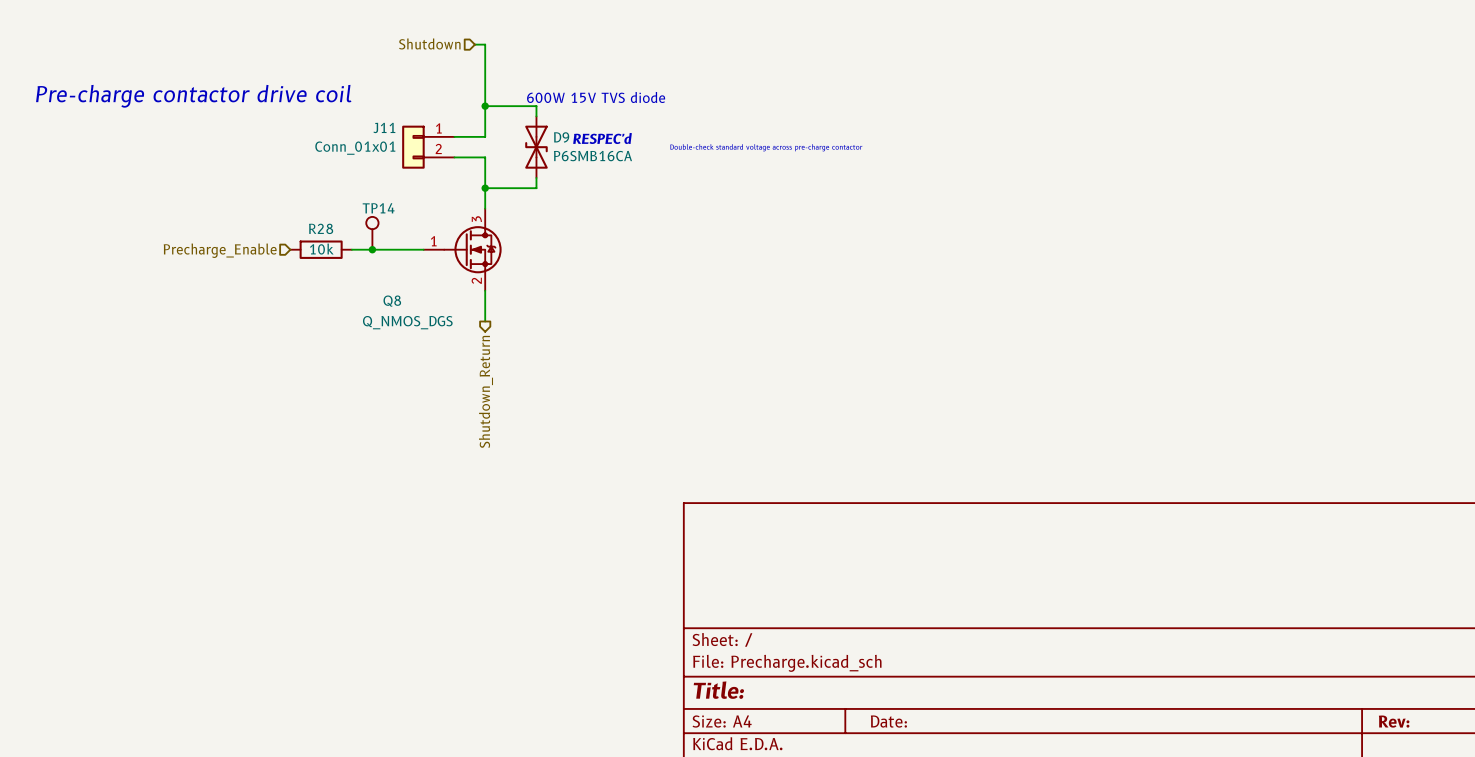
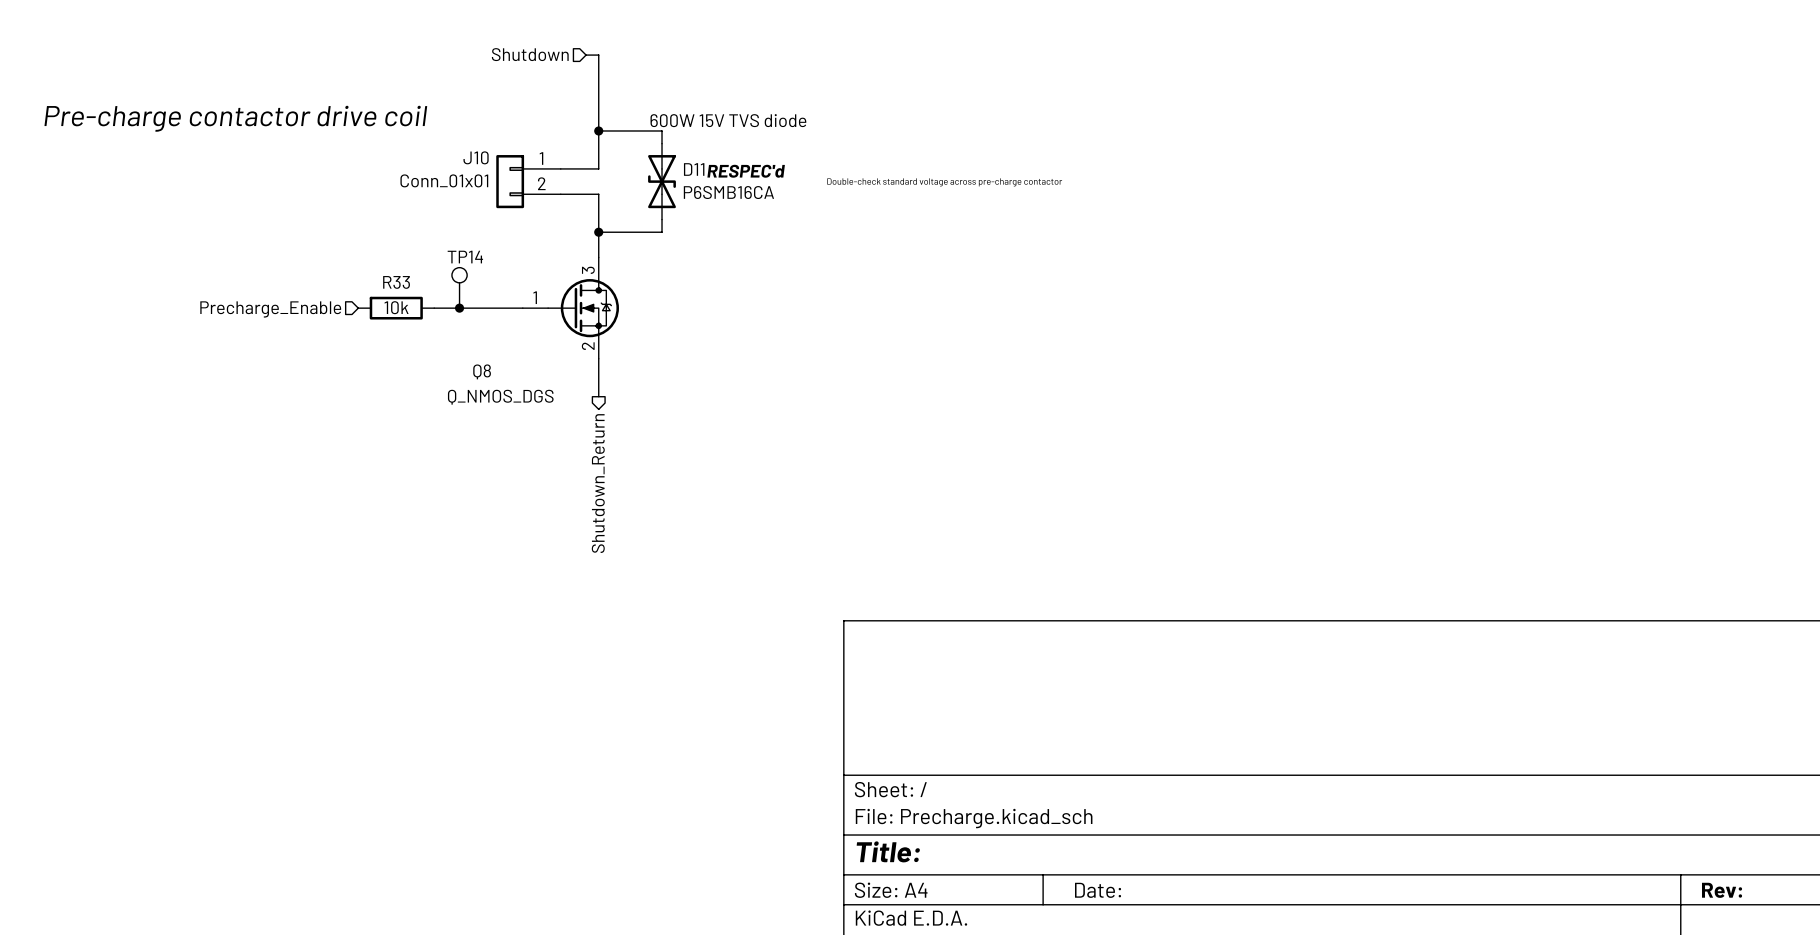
J11 name: J11 (384, 127) -> J10 (476, 157)
D9 name: D9 (561, 137) -> D11 (694, 169)
R28 name: R28 (321, 228) -> R33 (396, 282)

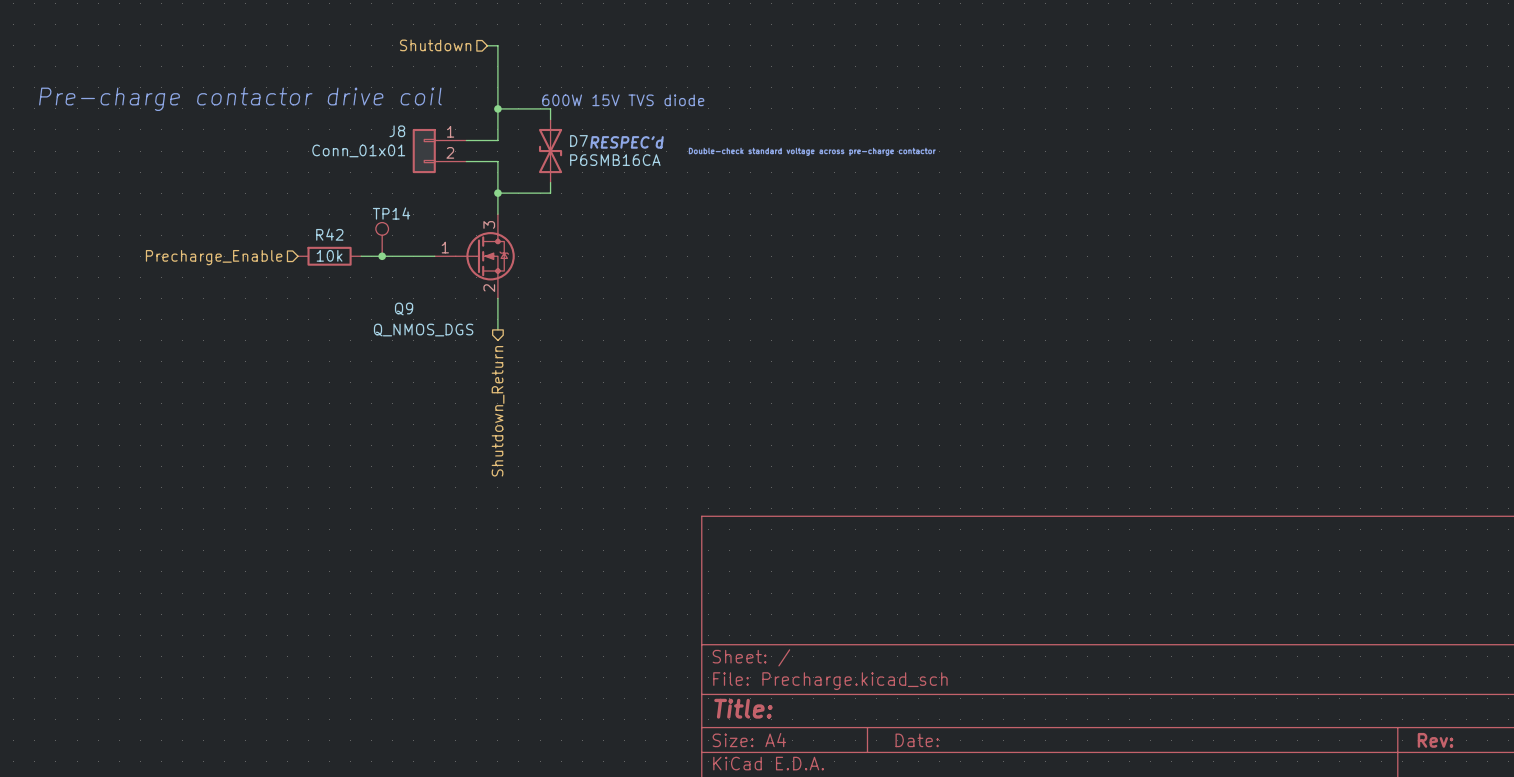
J10 name: J10 (476, 157) -> J8 (397, 131)
D11 name: D11 (694, 169) -> D7 (578, 140)
R33 name: R33 (396, 282) -> R42 (329, 234)
Q8 name: Q8 (482, 371) -> Q9 (404, 308)

